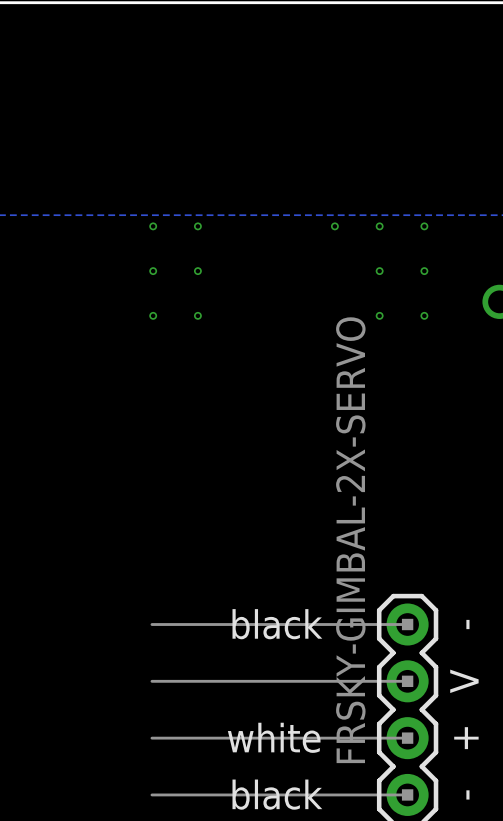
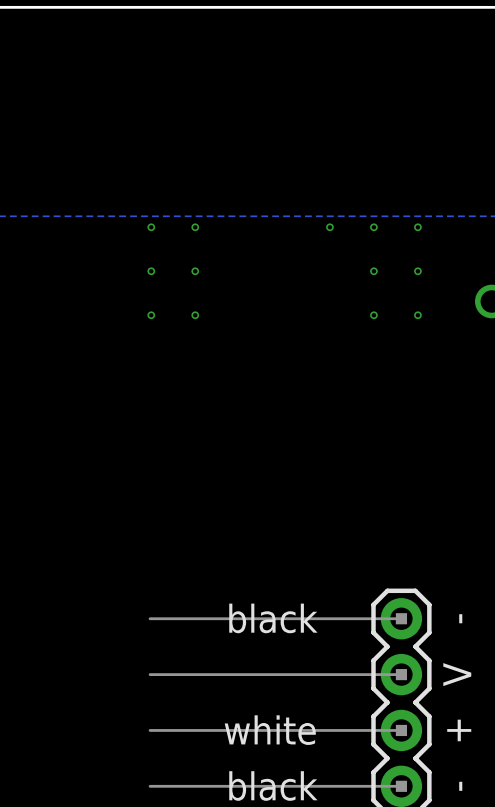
part value: FRSKY-GIMBAL-2X-SERVO (350, 540) -> none

